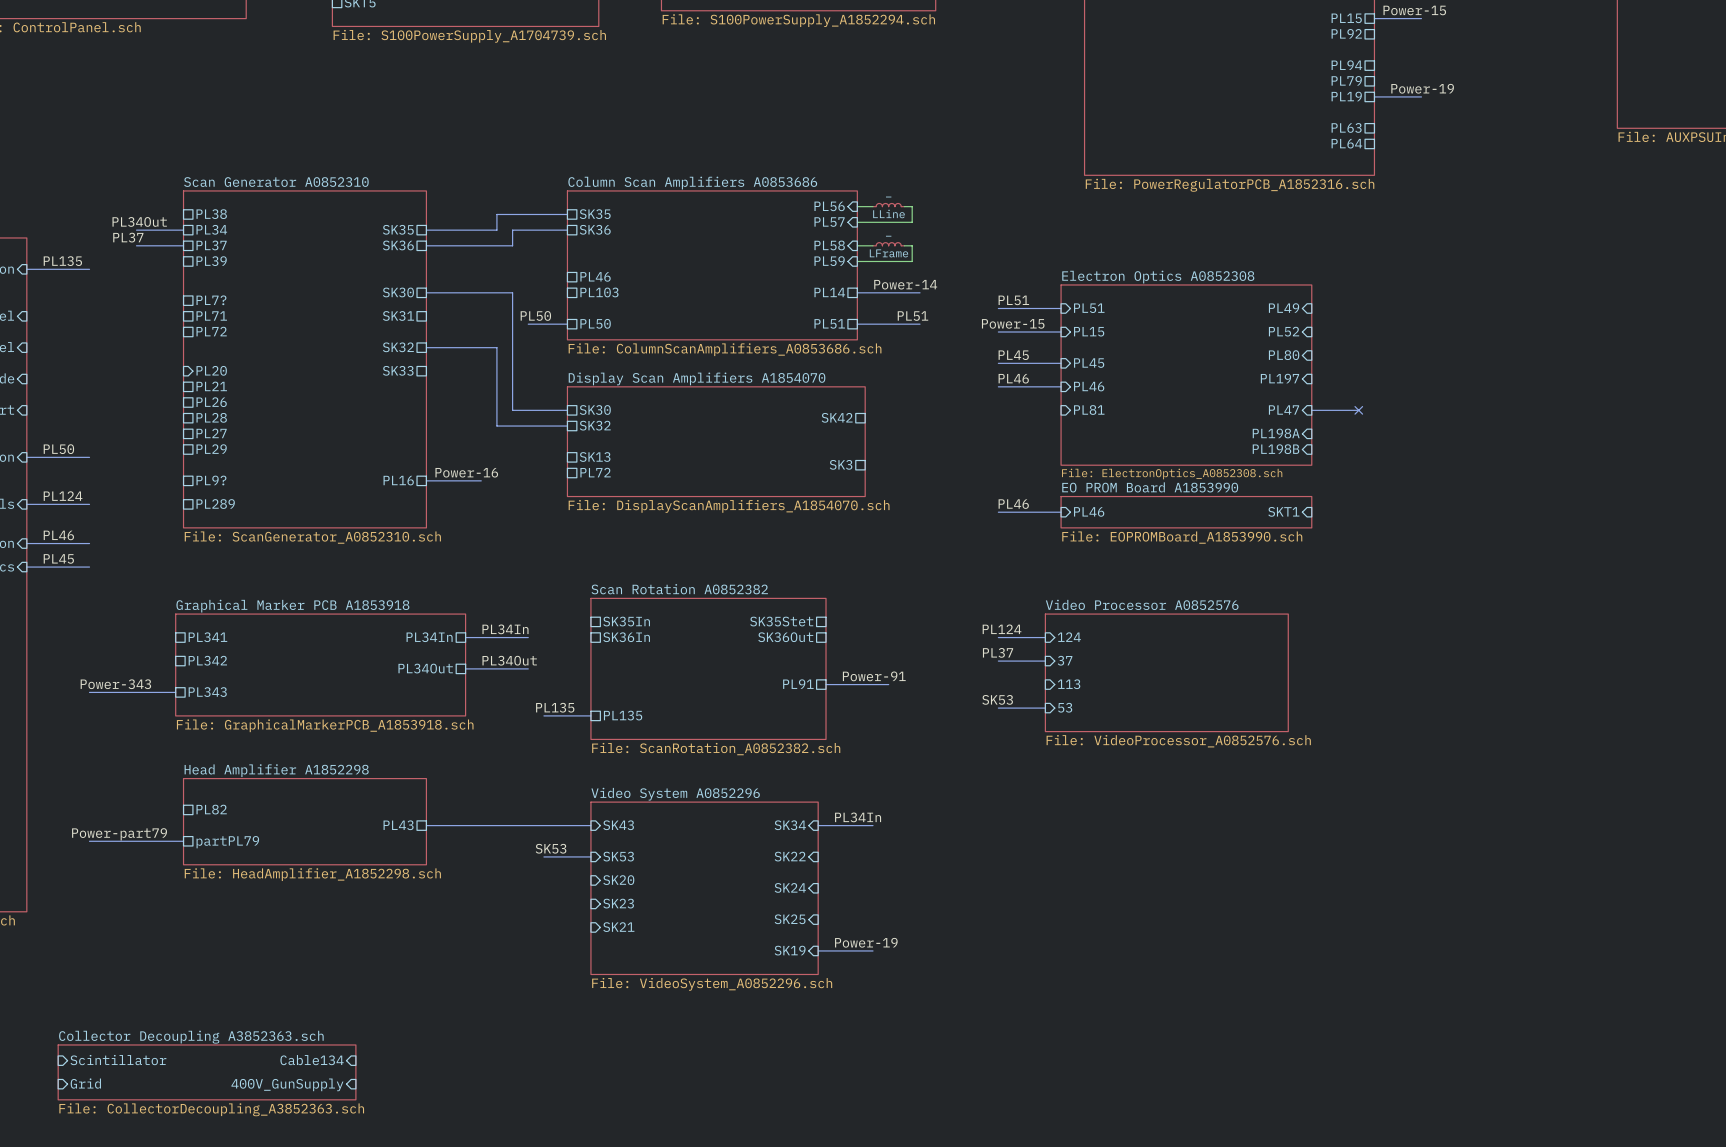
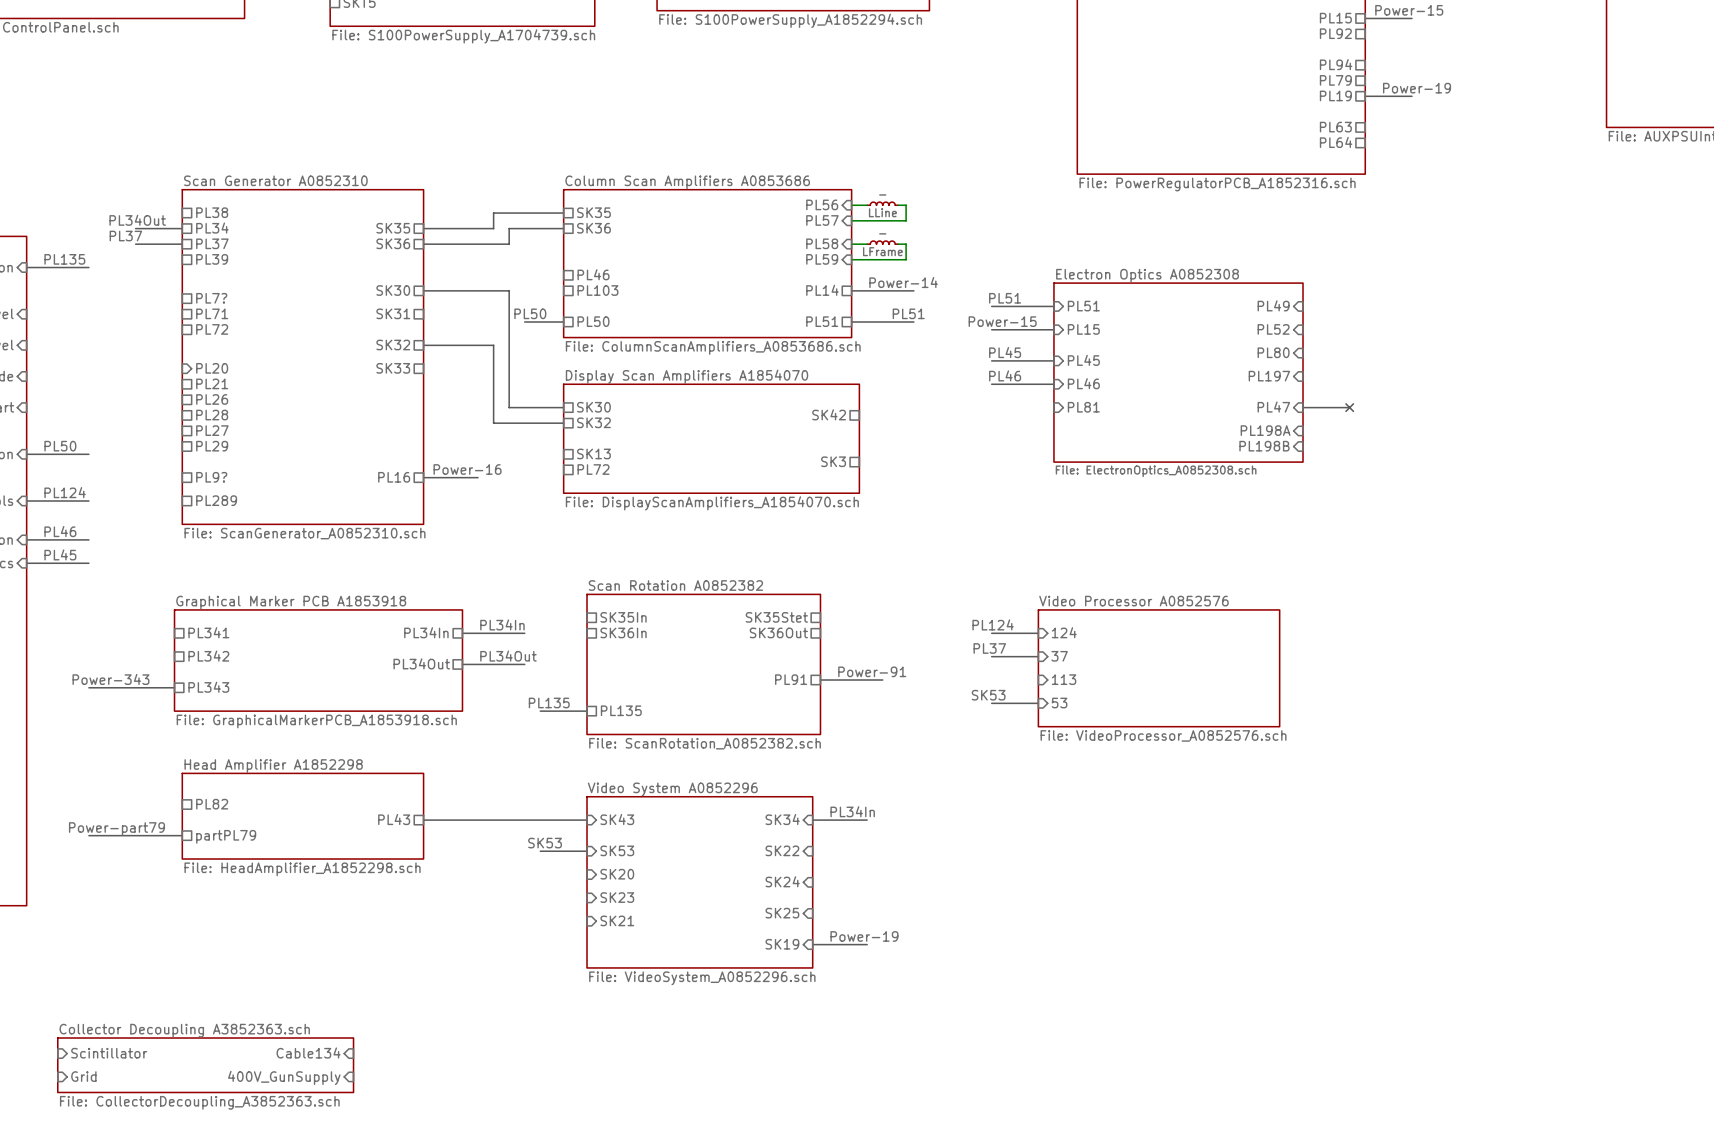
label: PL46 (1013, 504) -> none
sheet pin: PL46 (1089, 511) -> none
sheet pin: SKT1 (1283, 511) -> none
bus: (998, 512) (1061, 512) -> none
sheet EO PROM Board A1853990: File: EOPROMBoard_A1853990.sch (1186, 512) -> none

